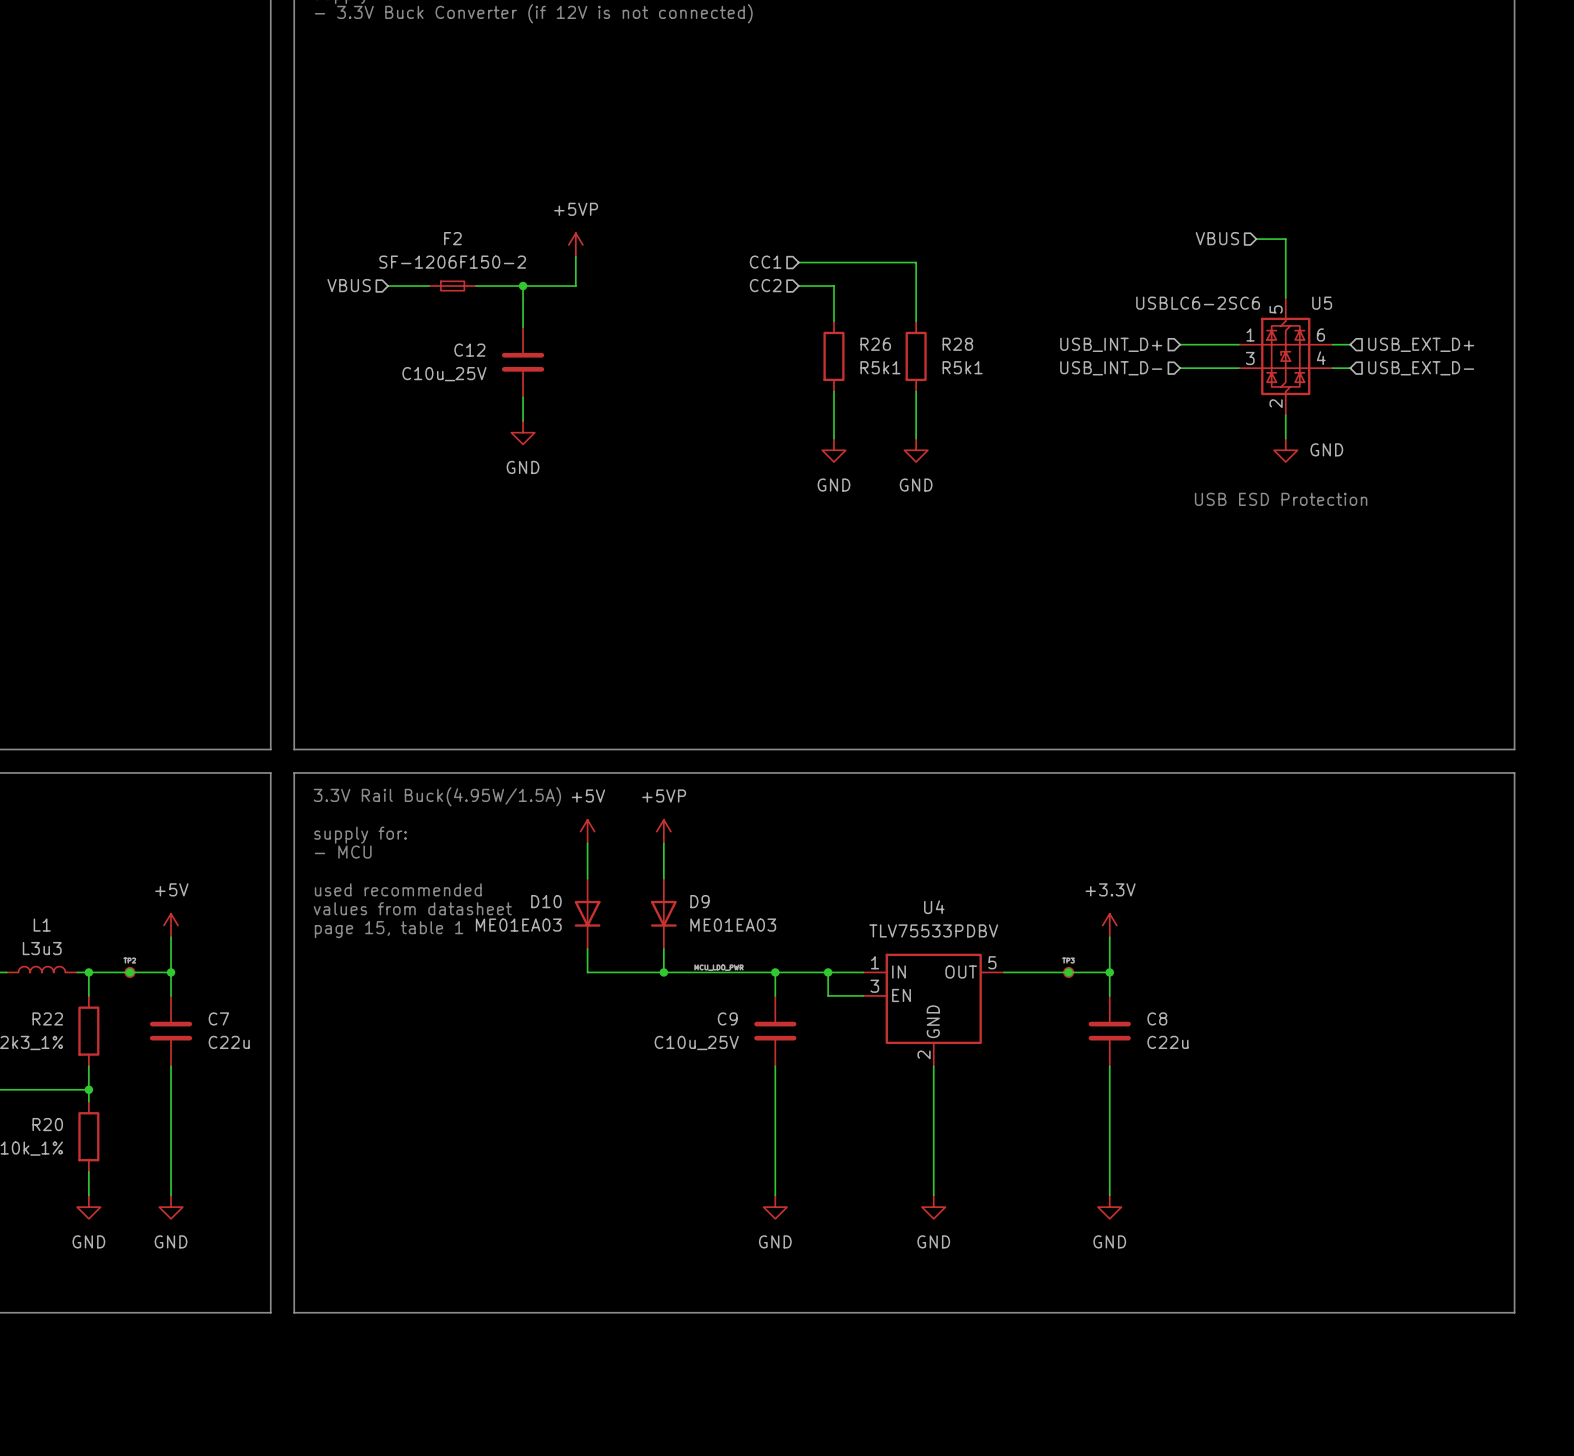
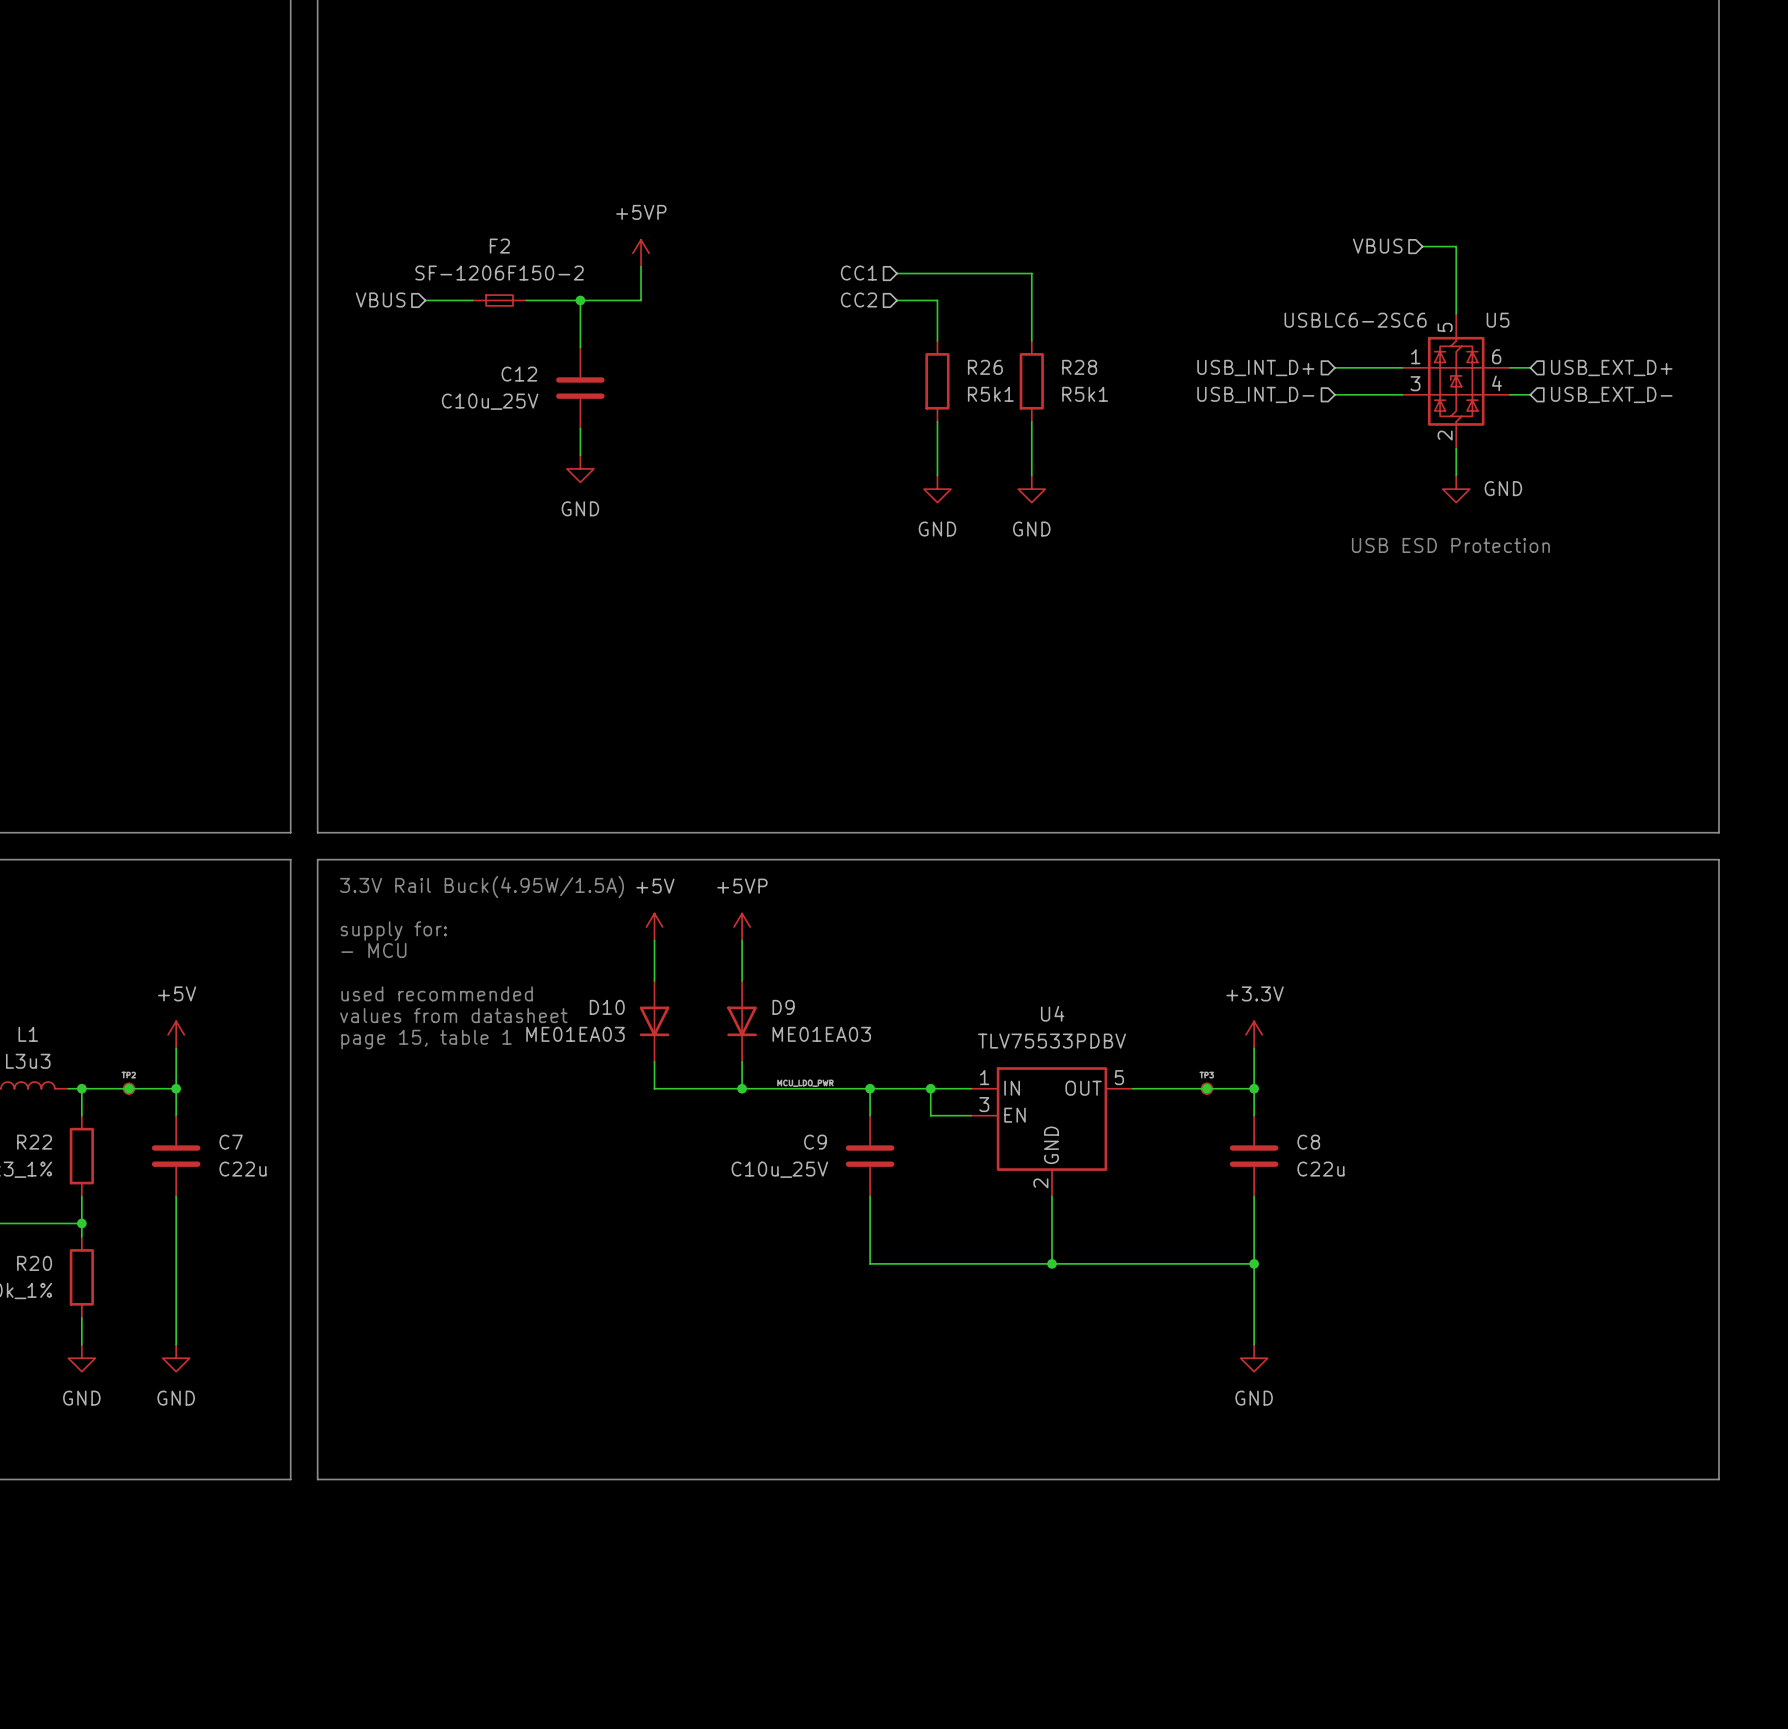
wire: (775, 1124) (775, 1195) -> (870, 1263) (1254, 1263)
wire: (933, 1124) (933, 1195) -> none
junction: none -> (1052, 1263)
junction: none -> (1254, 1263)
power symbol: GND (775, 1207) -> none
power symbol: GND (933, 1207) -> none

